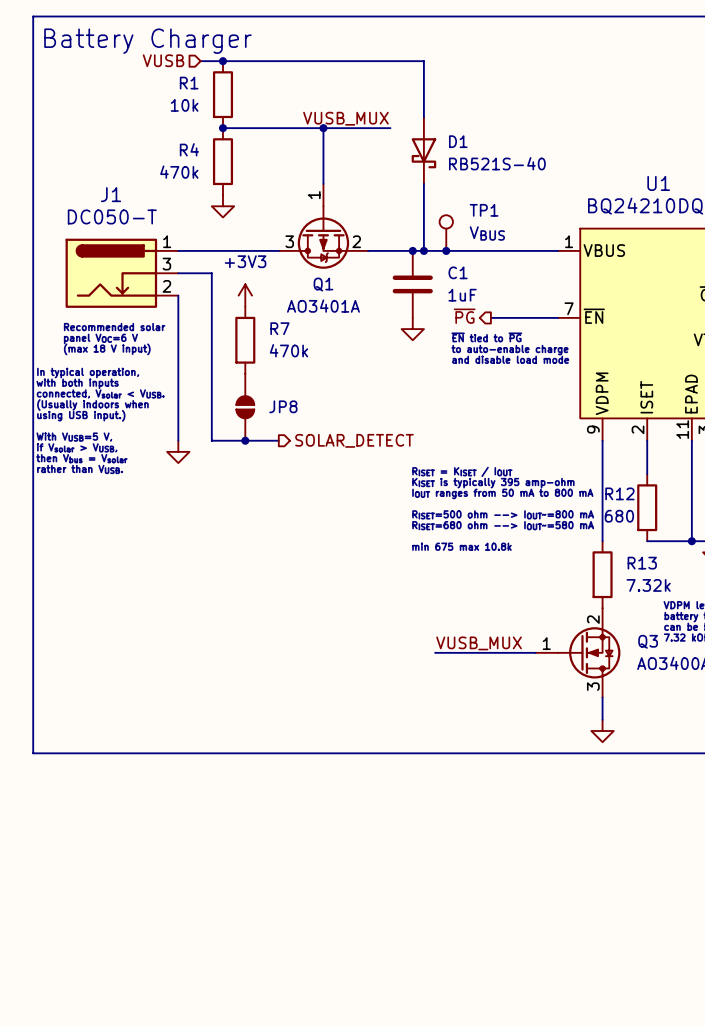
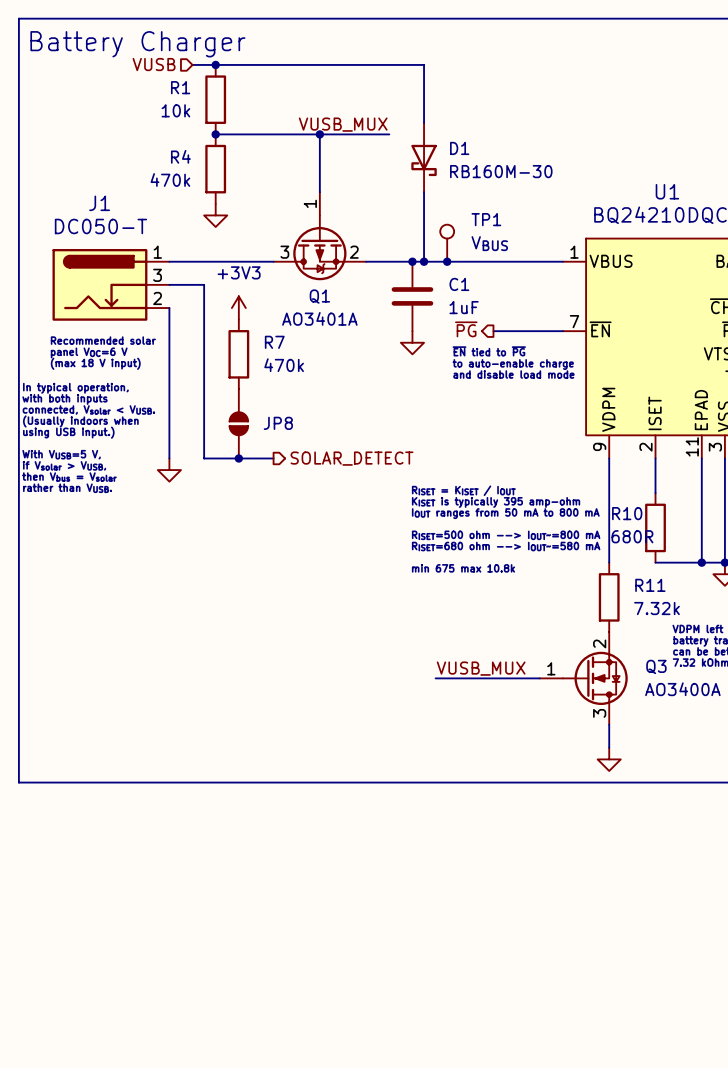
D1 value: RB521S-40 (497, 163) -> RB160M-30 (501, 171)
R12 name: R12 (619, 493) -> R10 (627, 513)
R12 value: 680 (619, 516) -> 680R (632, 536)
R13 name: R13 (642, 563) -> R11 (650, 585)

